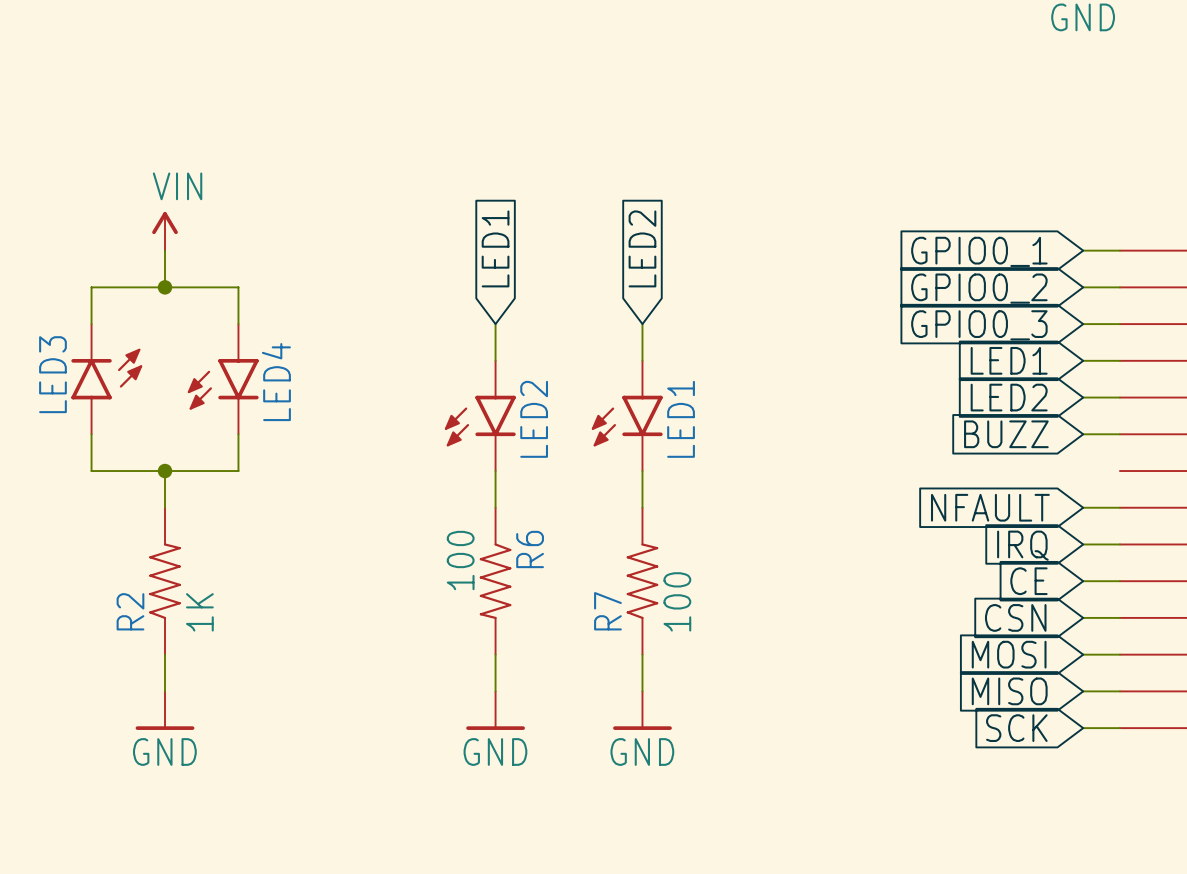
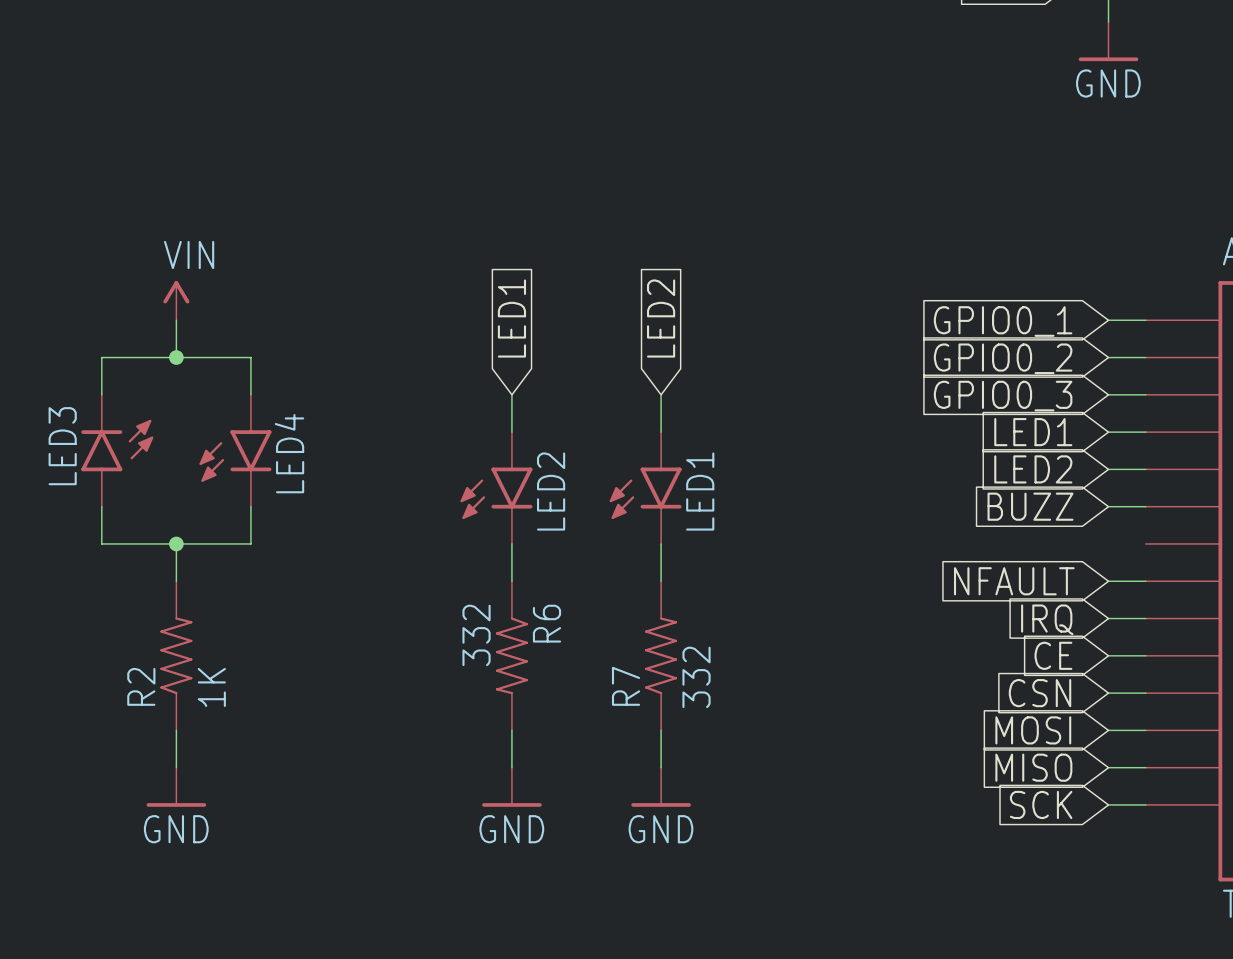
R6 value: 100 (460, 560) -> 332 (476, 635)
R7 value: 100 (677, 601) -> 332 (696, 677)

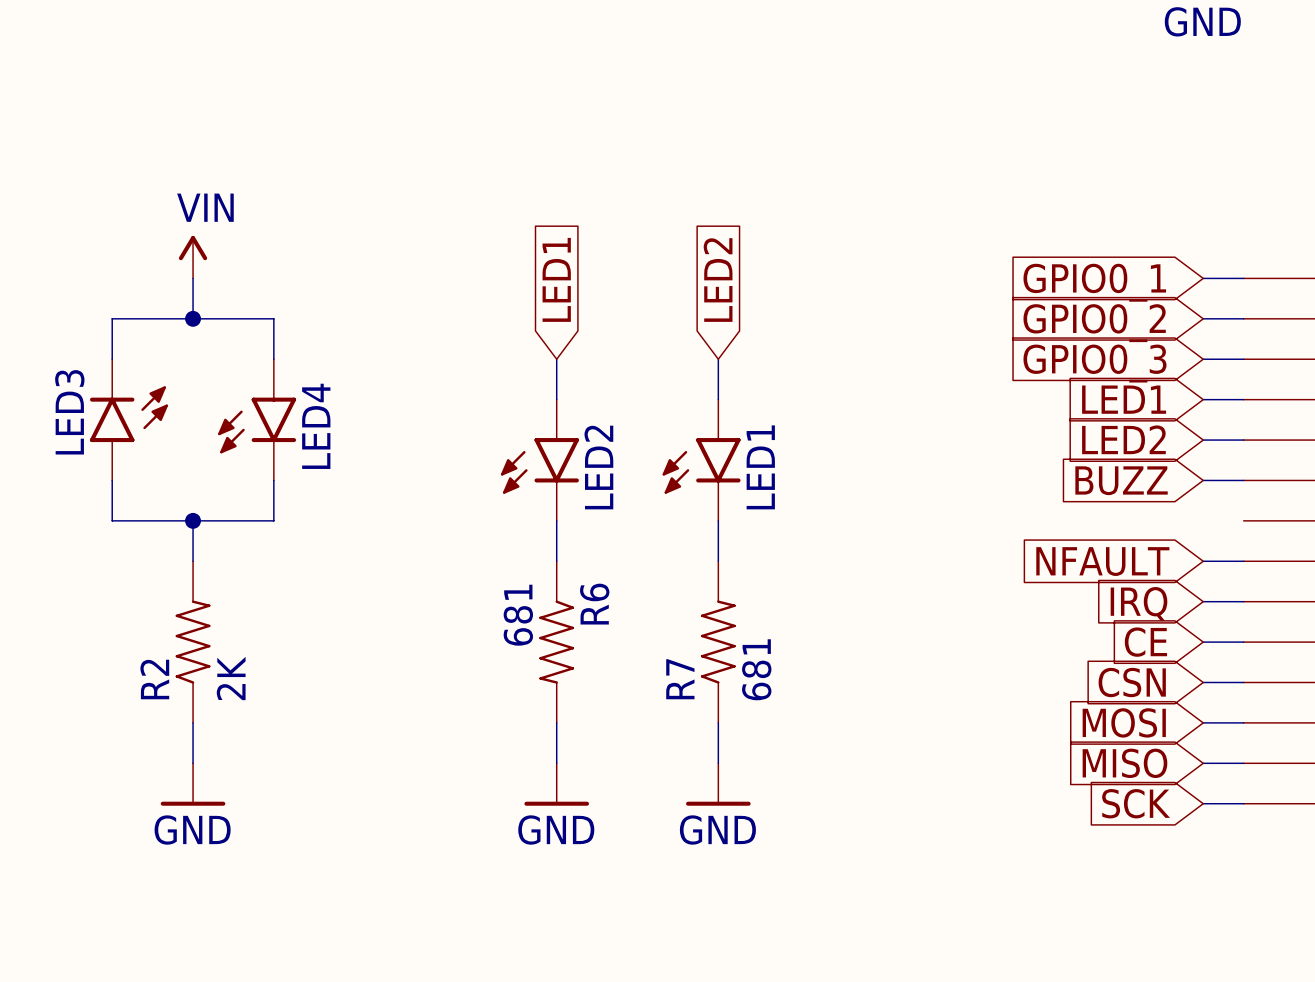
R6 value: 332 (476, 635) -> 681 (518, 615)
R7 value: 332 (696, 677) -> 681 (756, 669)
R2 value: 1K (211, 687) -> 2K (231, 678)

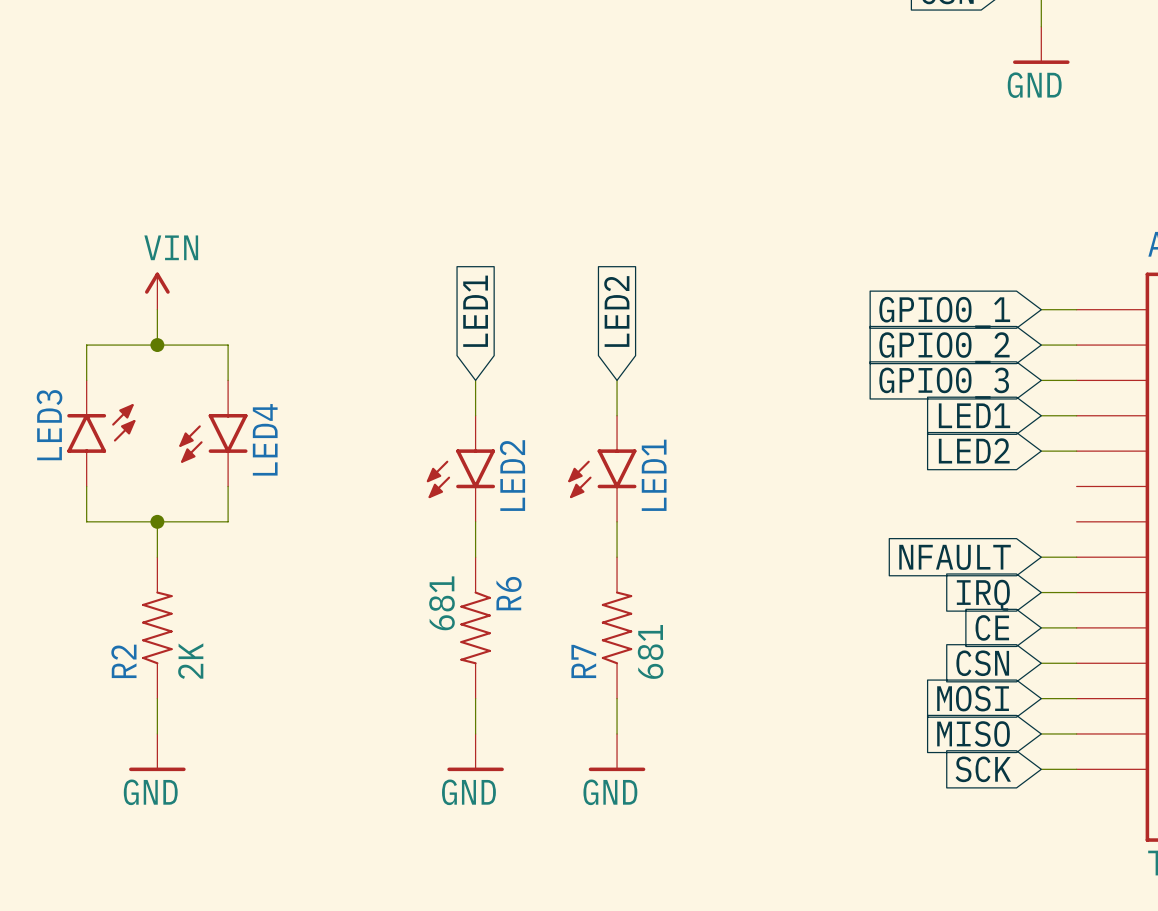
global label: BUZZ (1121, 480) -> none
wire: (1203, 480) (1243, 480) -> none

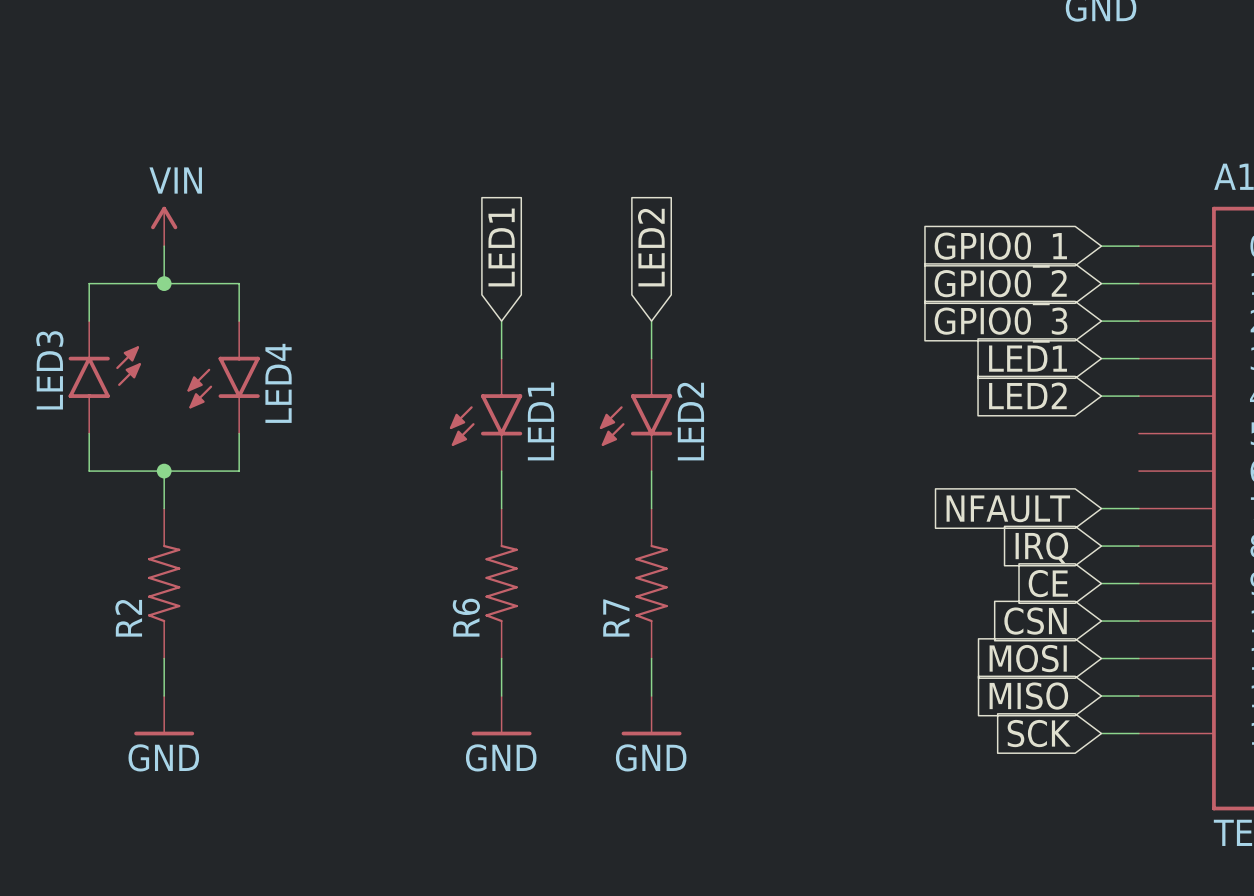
LED2 name: LED2 (512, 475) -> LED1 (540, 421)
LED1 name: LED1 (654, 475) -> LED2 (690, 421)
R6 value: 681 (442, 603) -> none
R6 rotation: 0° (475, 627) -> 180° (501, 583)
R7 value: 681 (650, 651) -> none
R2 value: 2K (190, 661) -> none

